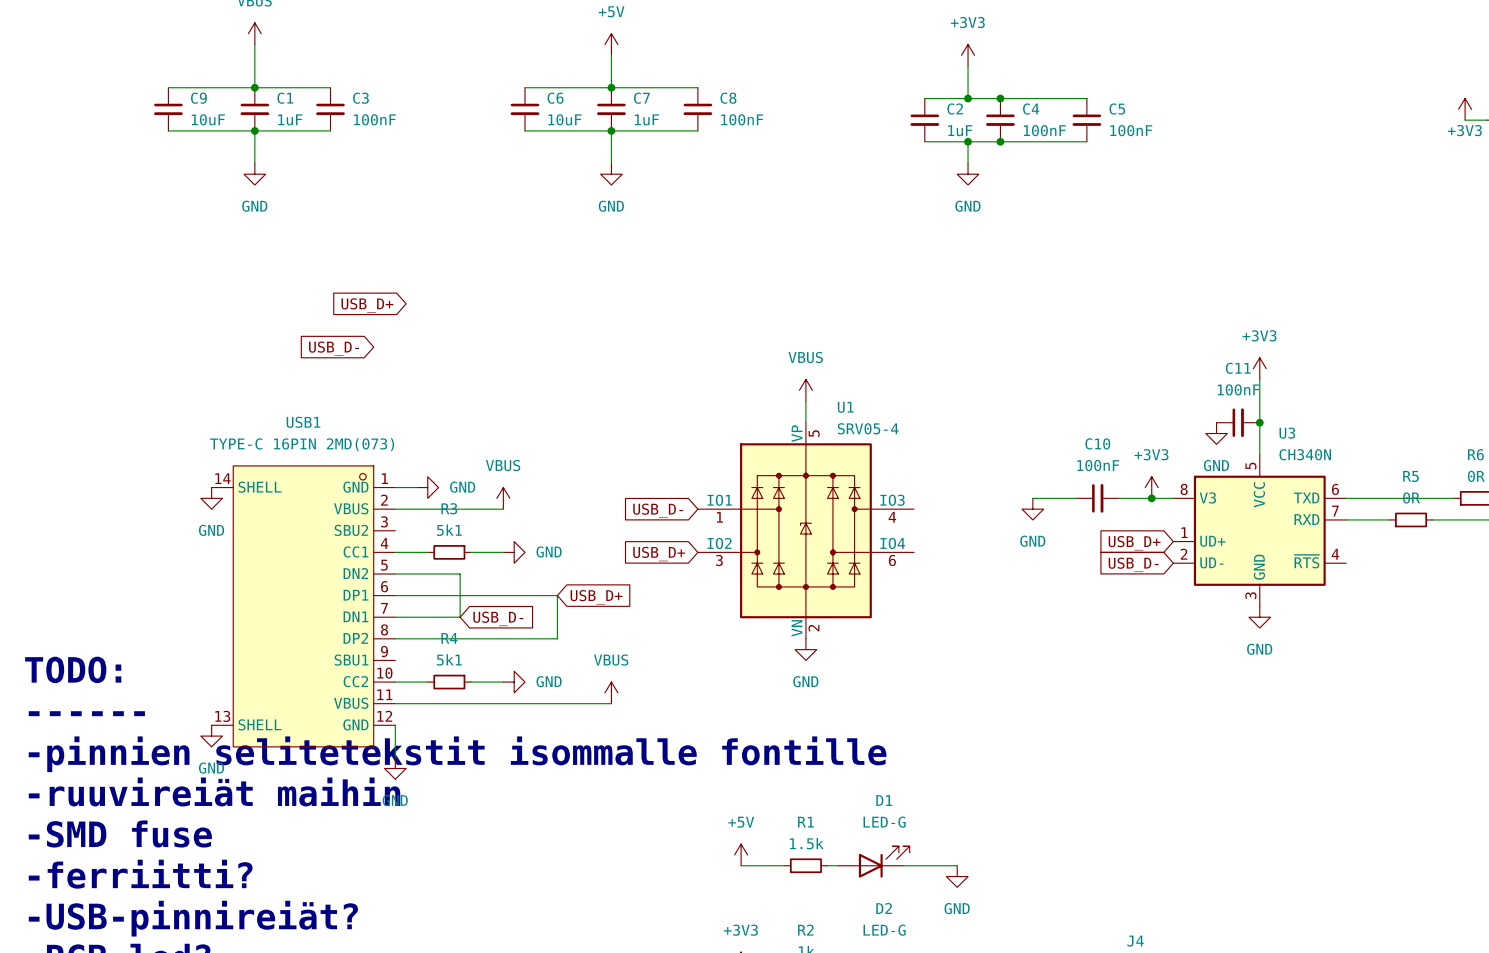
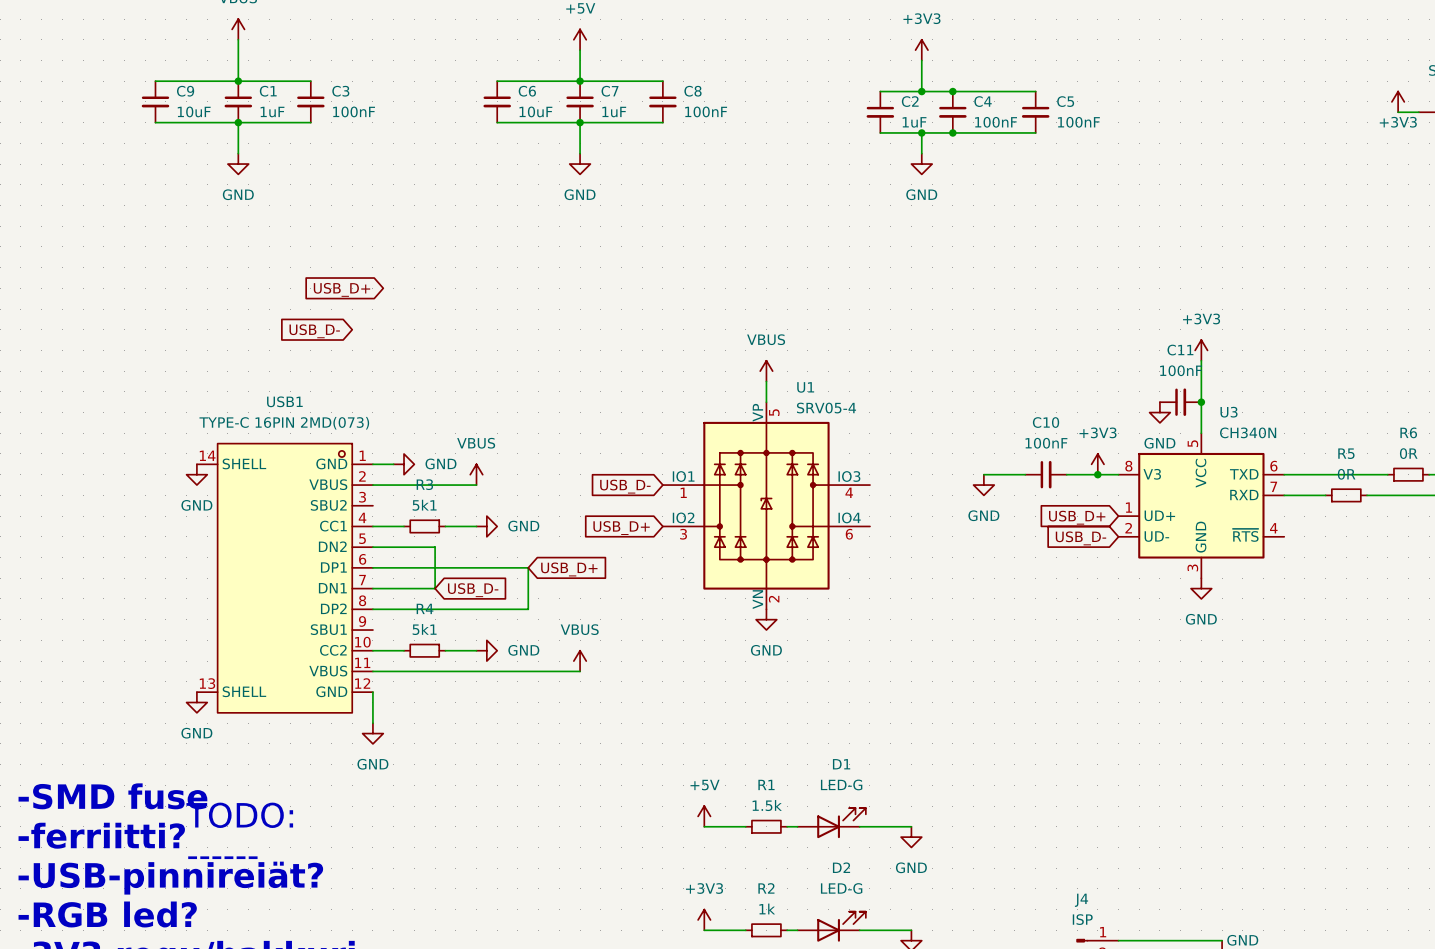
text: TODO: (73, 669) -> none
text: ------ (86, 713) -> none
text: -pinnien selitetekstit isommalle fontille (457, 754) -> none
text: -ruuvireiät maihin (214, 791) -> none
text: none -> TODO: (239, 815)
text: none -> ------ (222, 857)

